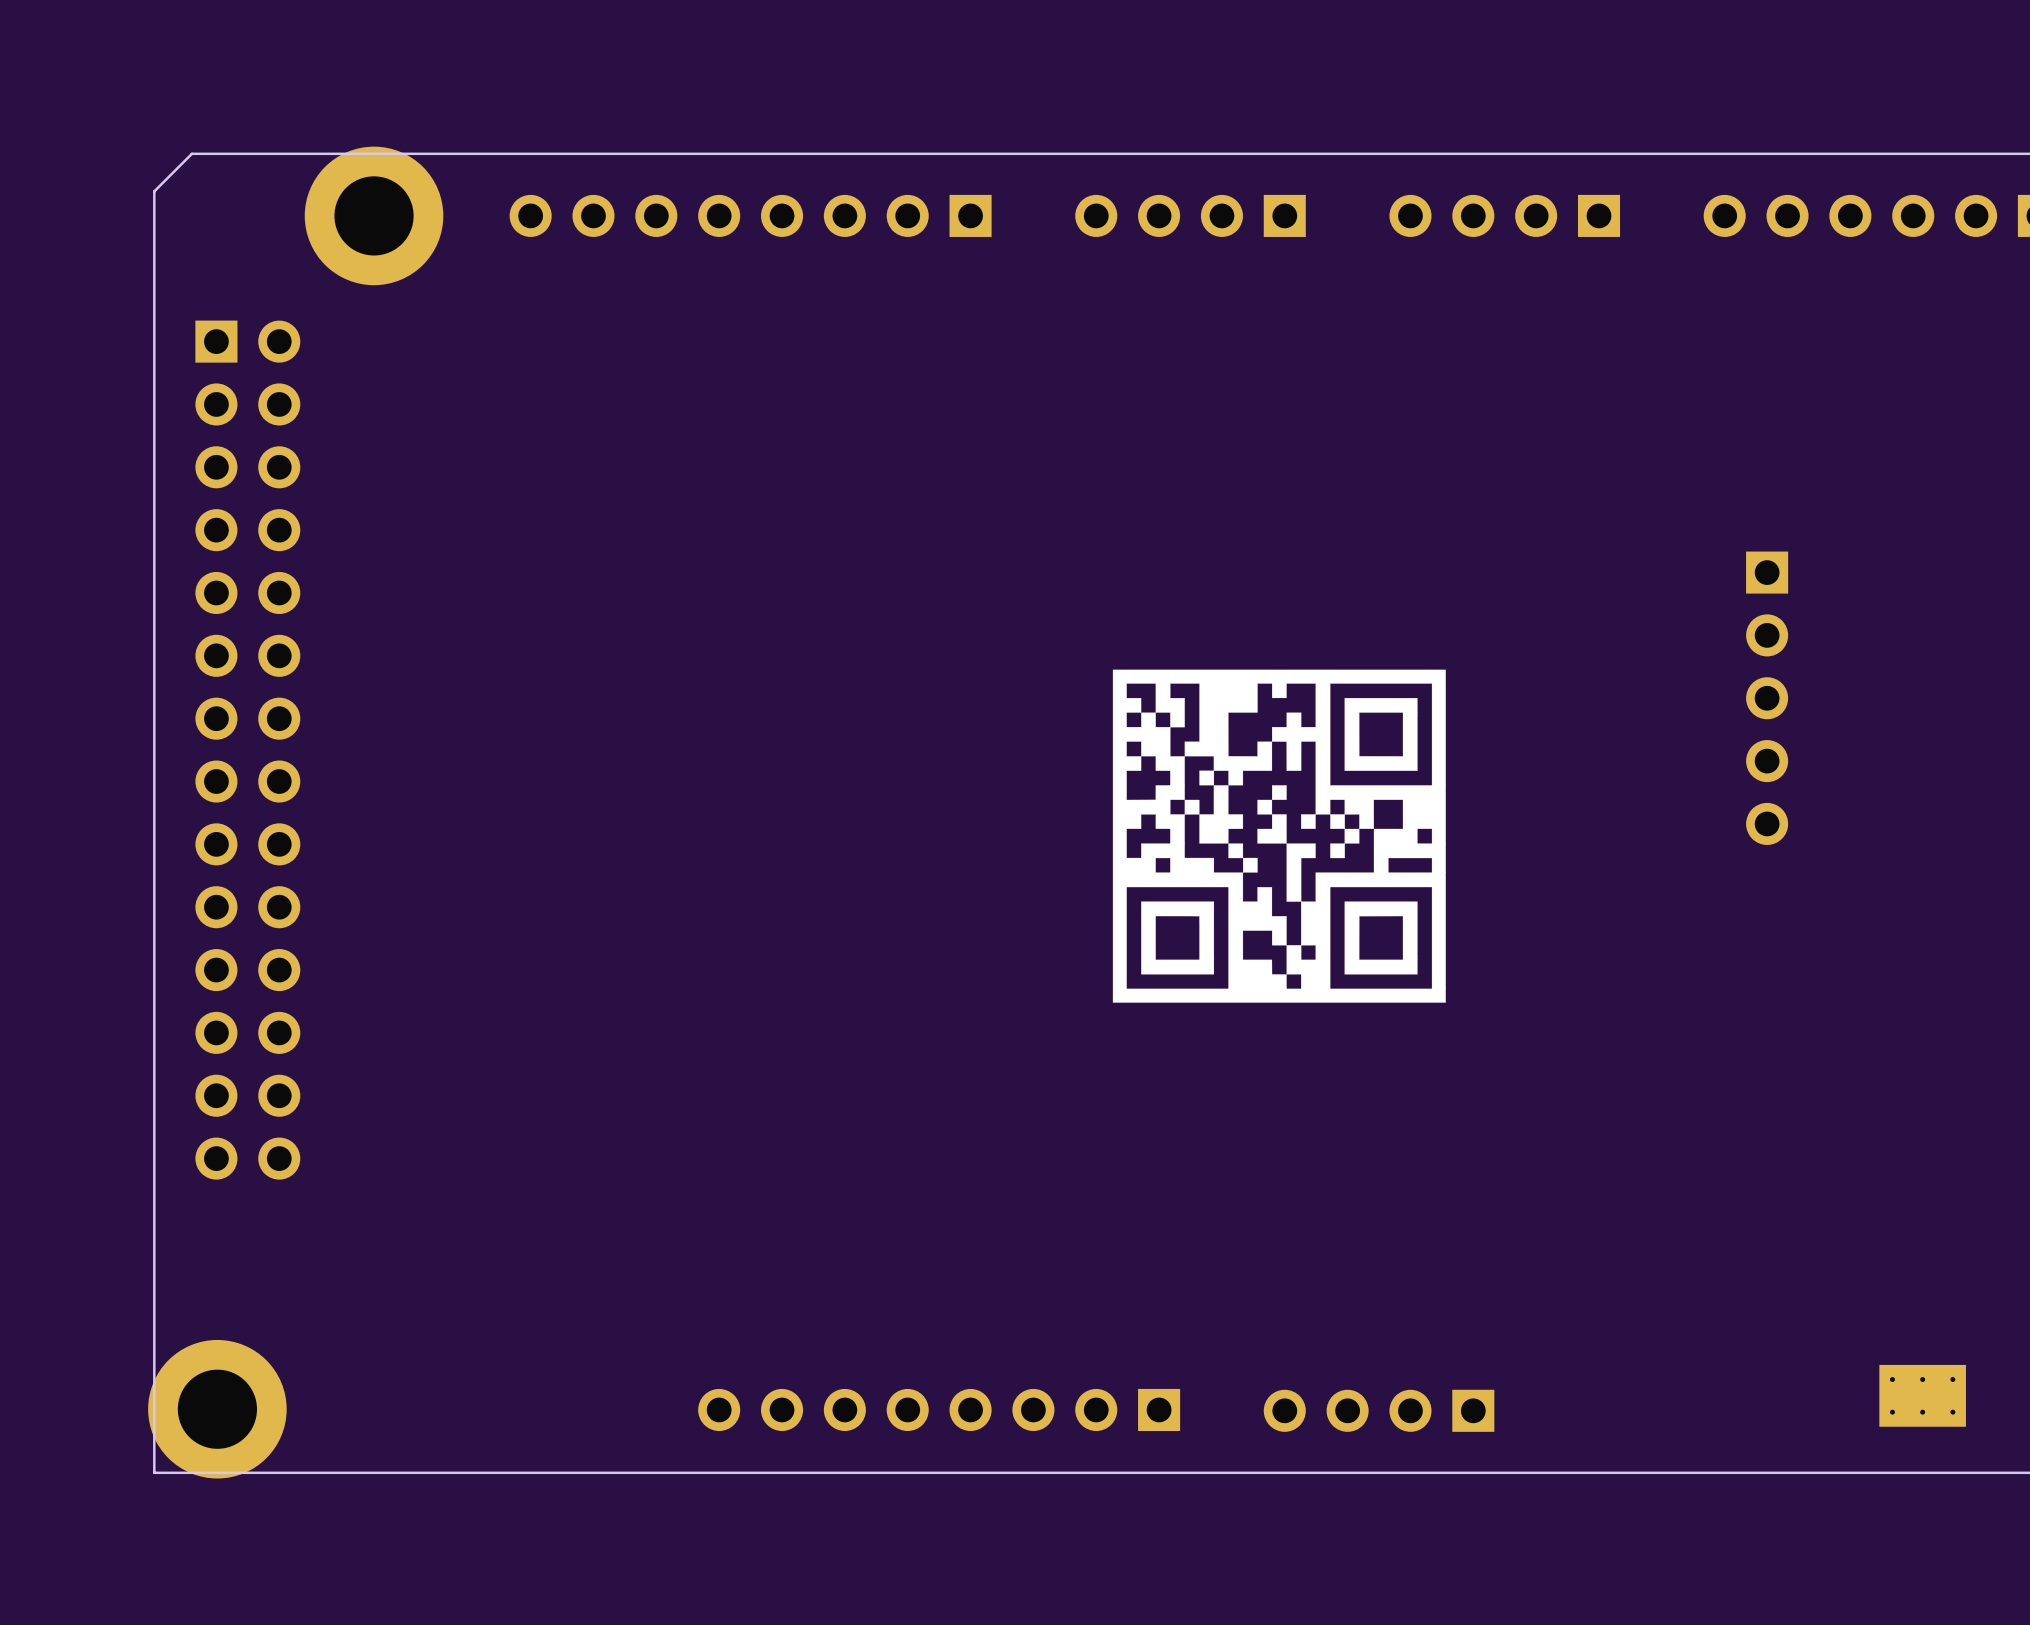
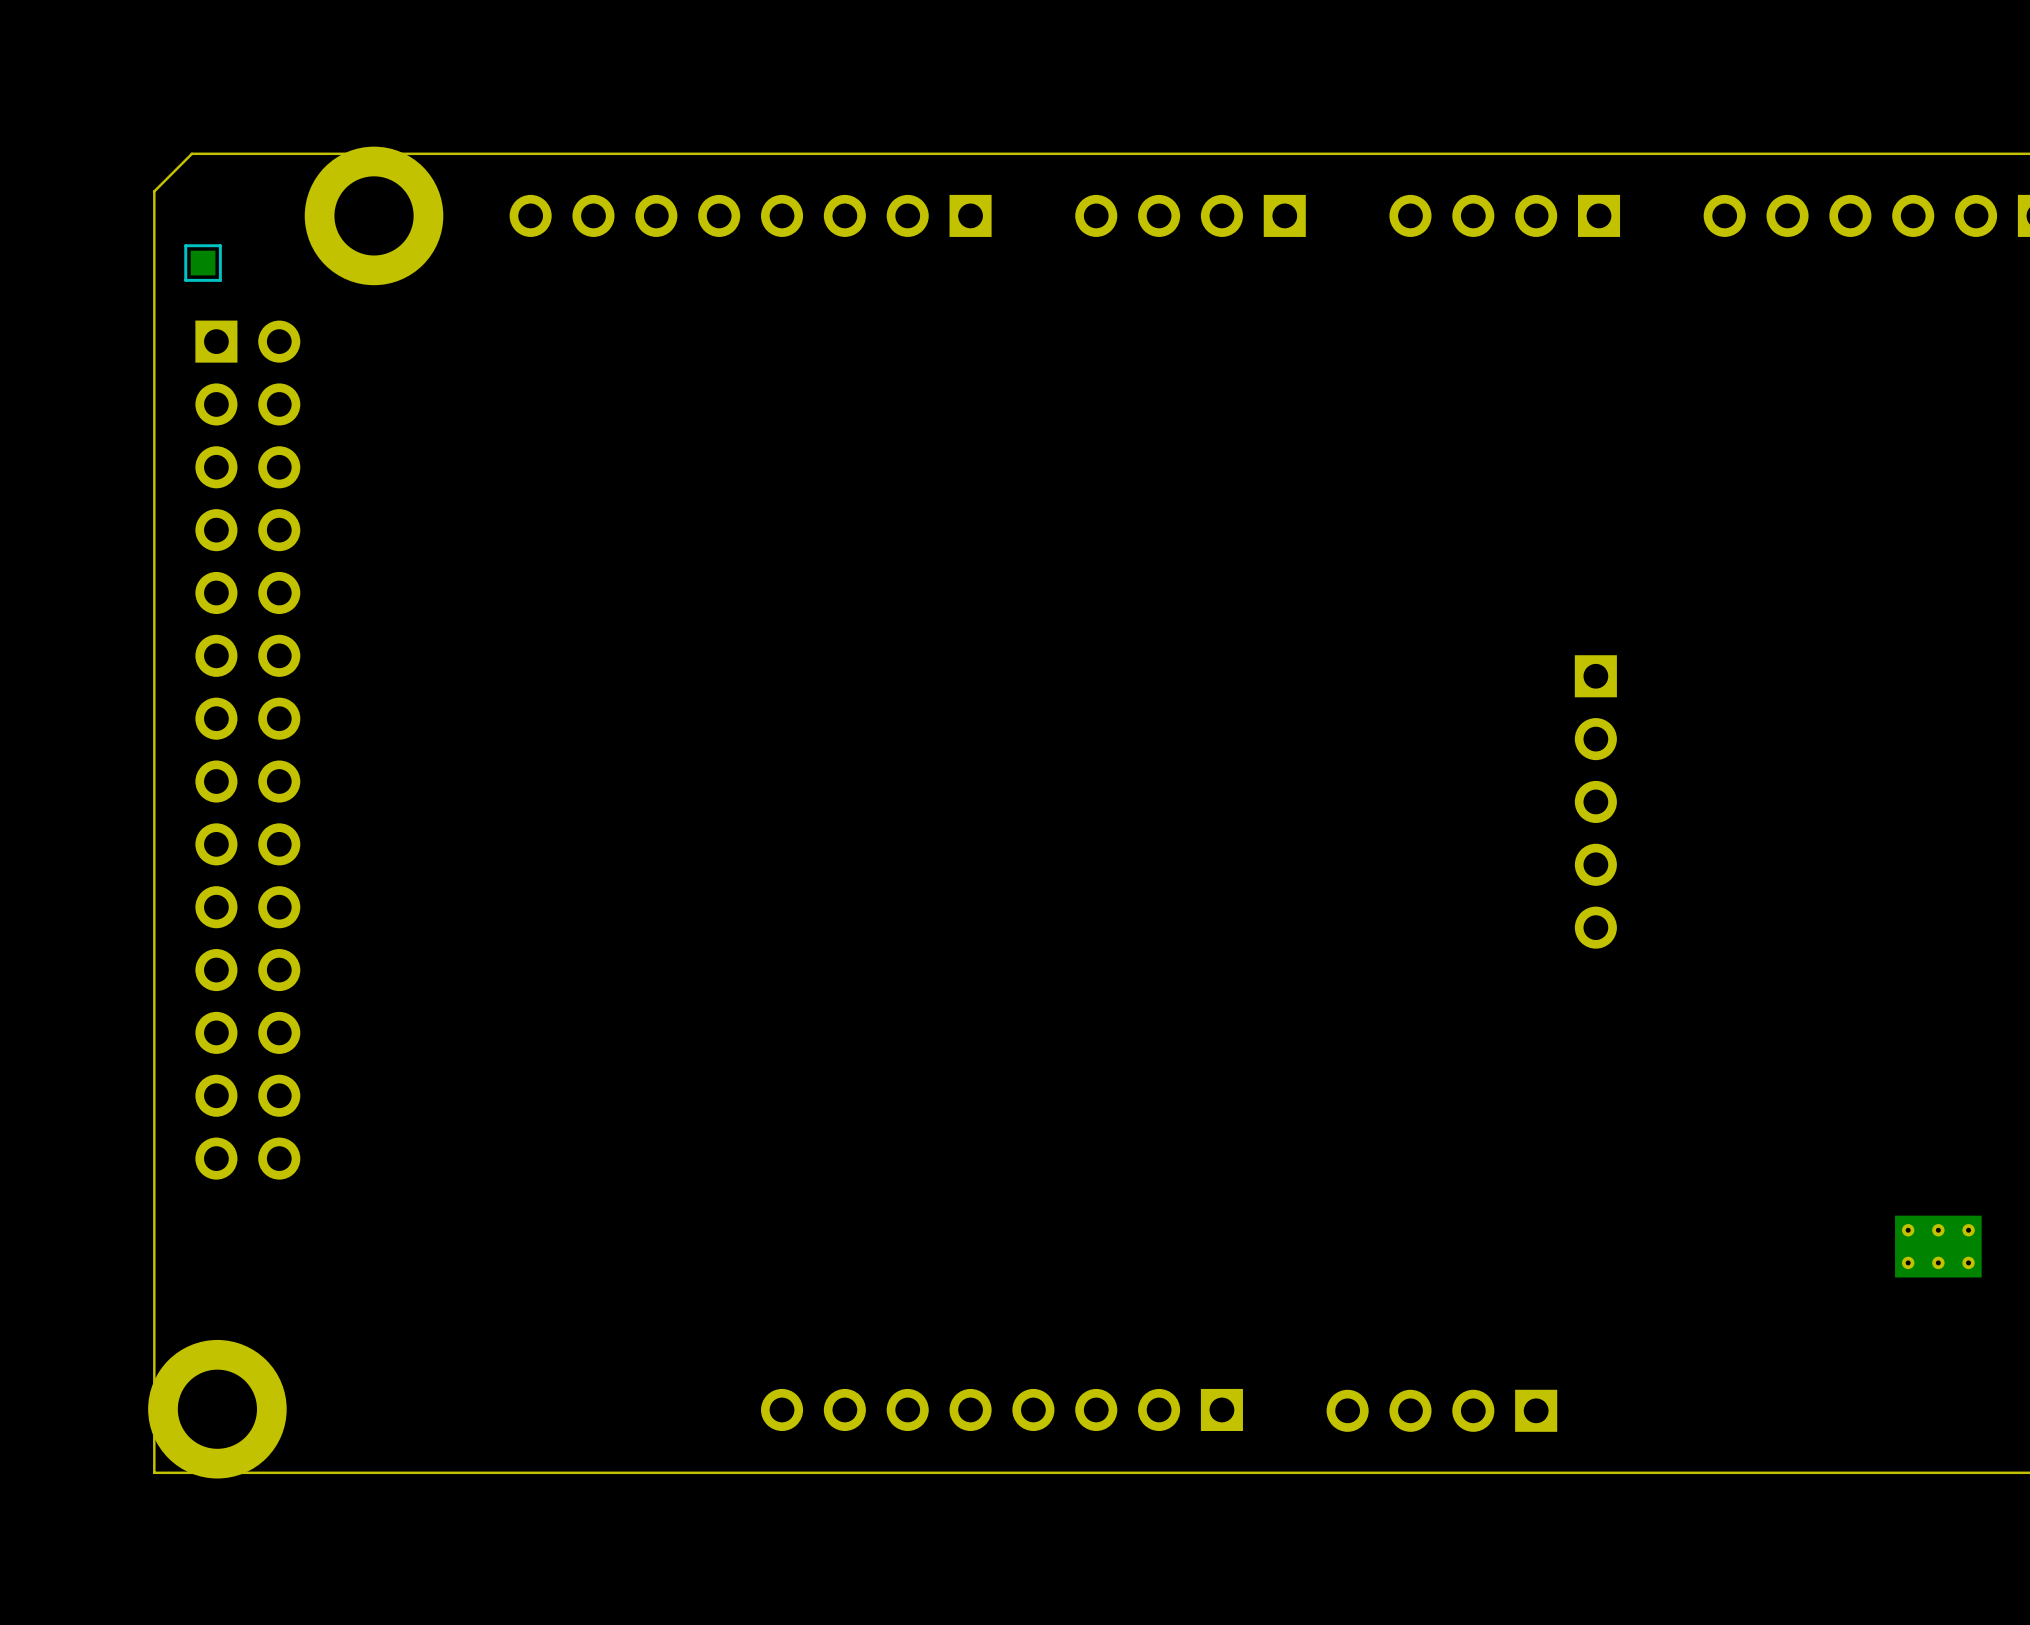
part: none -> (203, 263)
drawing: [1112, 669, 1446, 1003] -> none
part position: (1767, 698) -> (1595, 801)
part position: (1922, 1395) -> (1938, 1246)
part position: (939, 1409) -> (1001, 1409)
part position: (1379, 1410) -> (1441, 1410)

